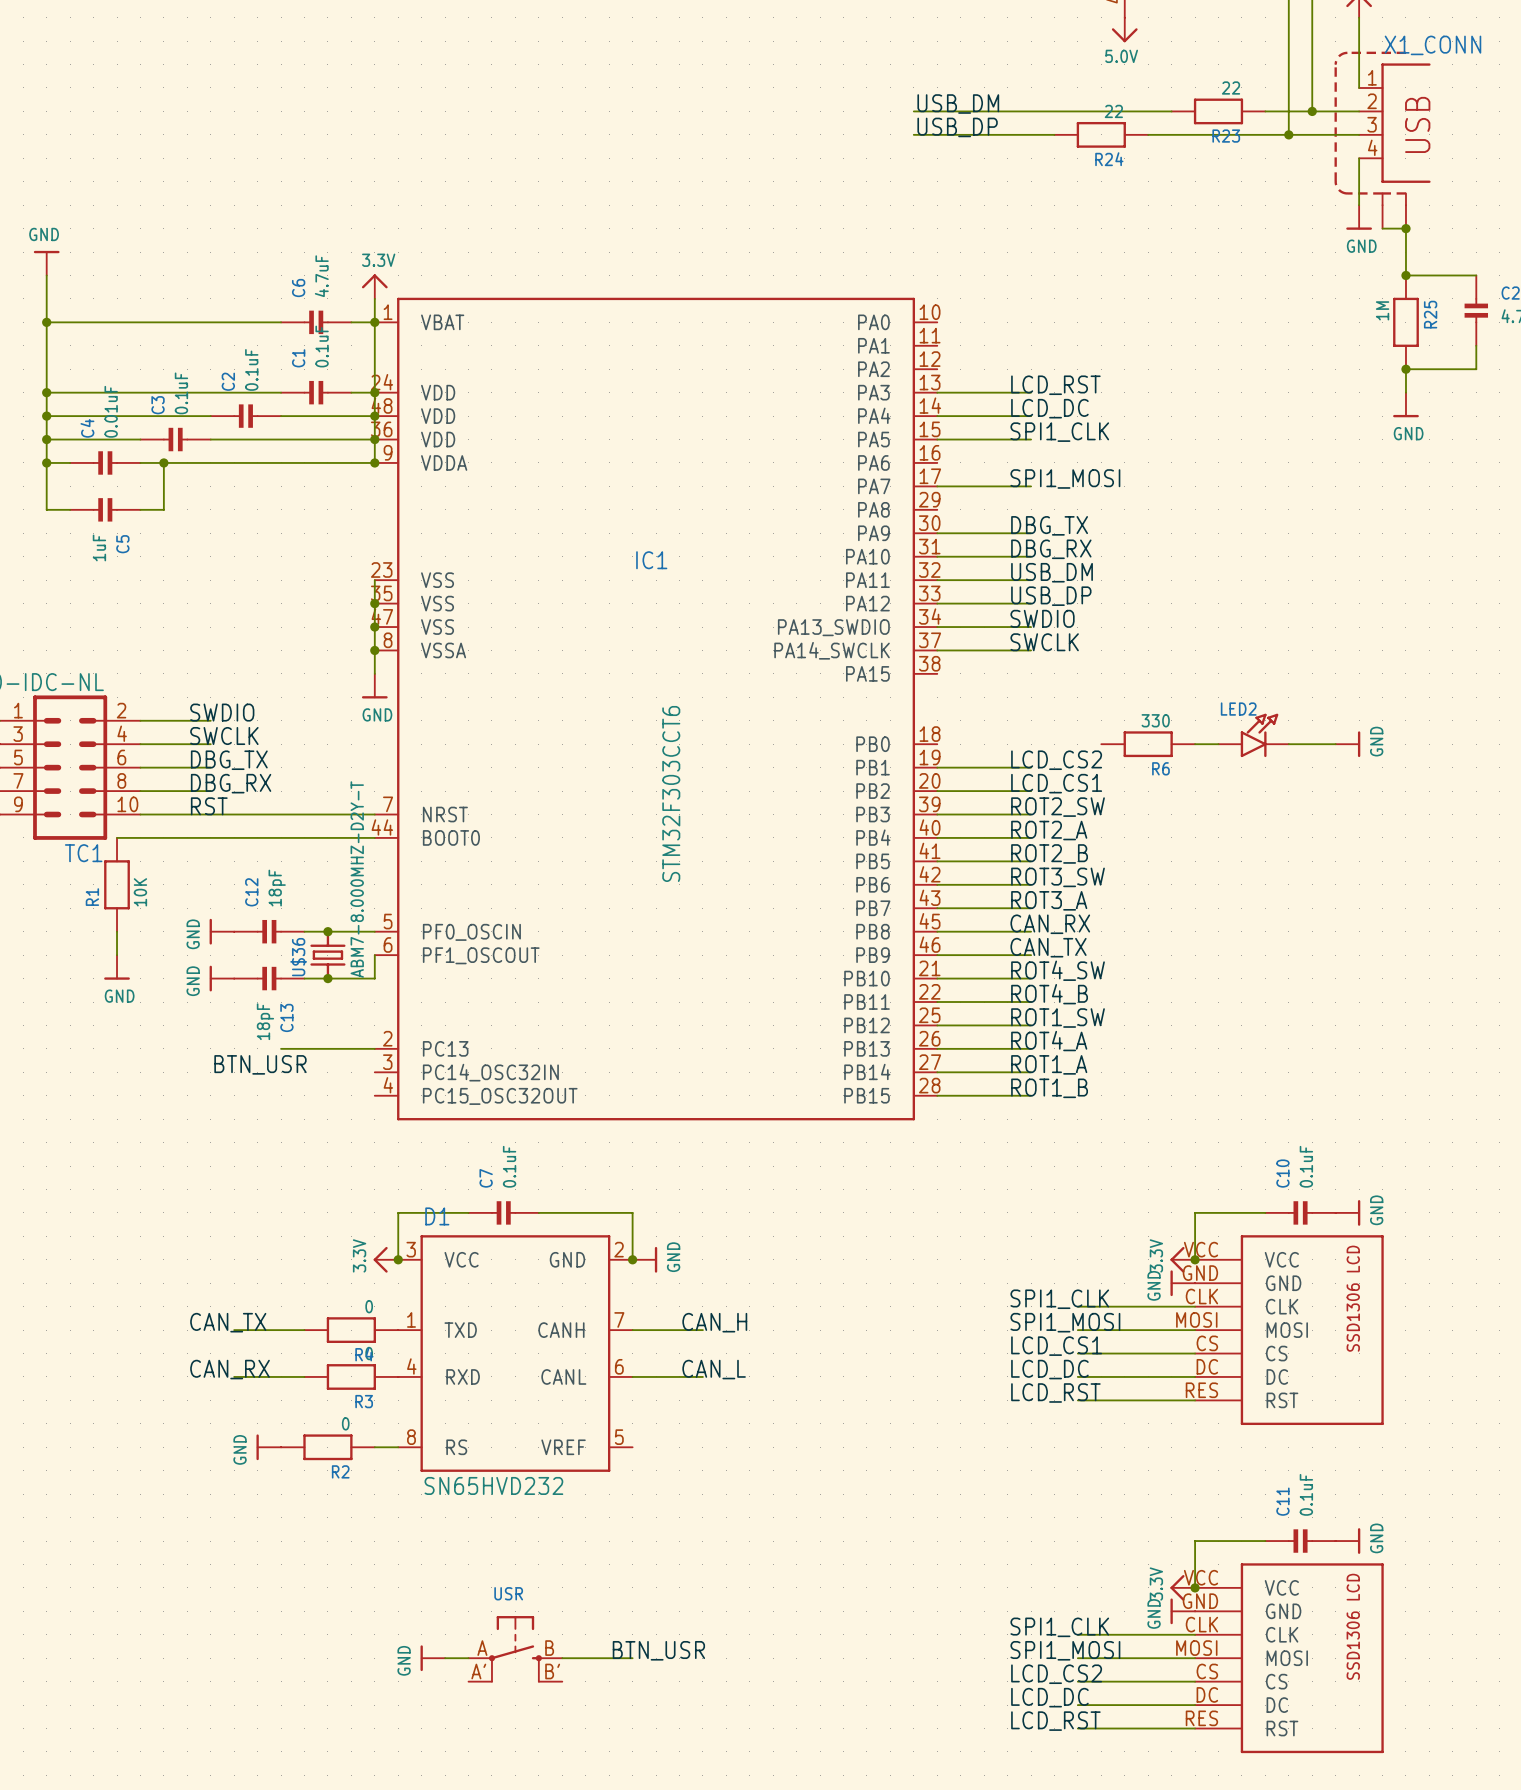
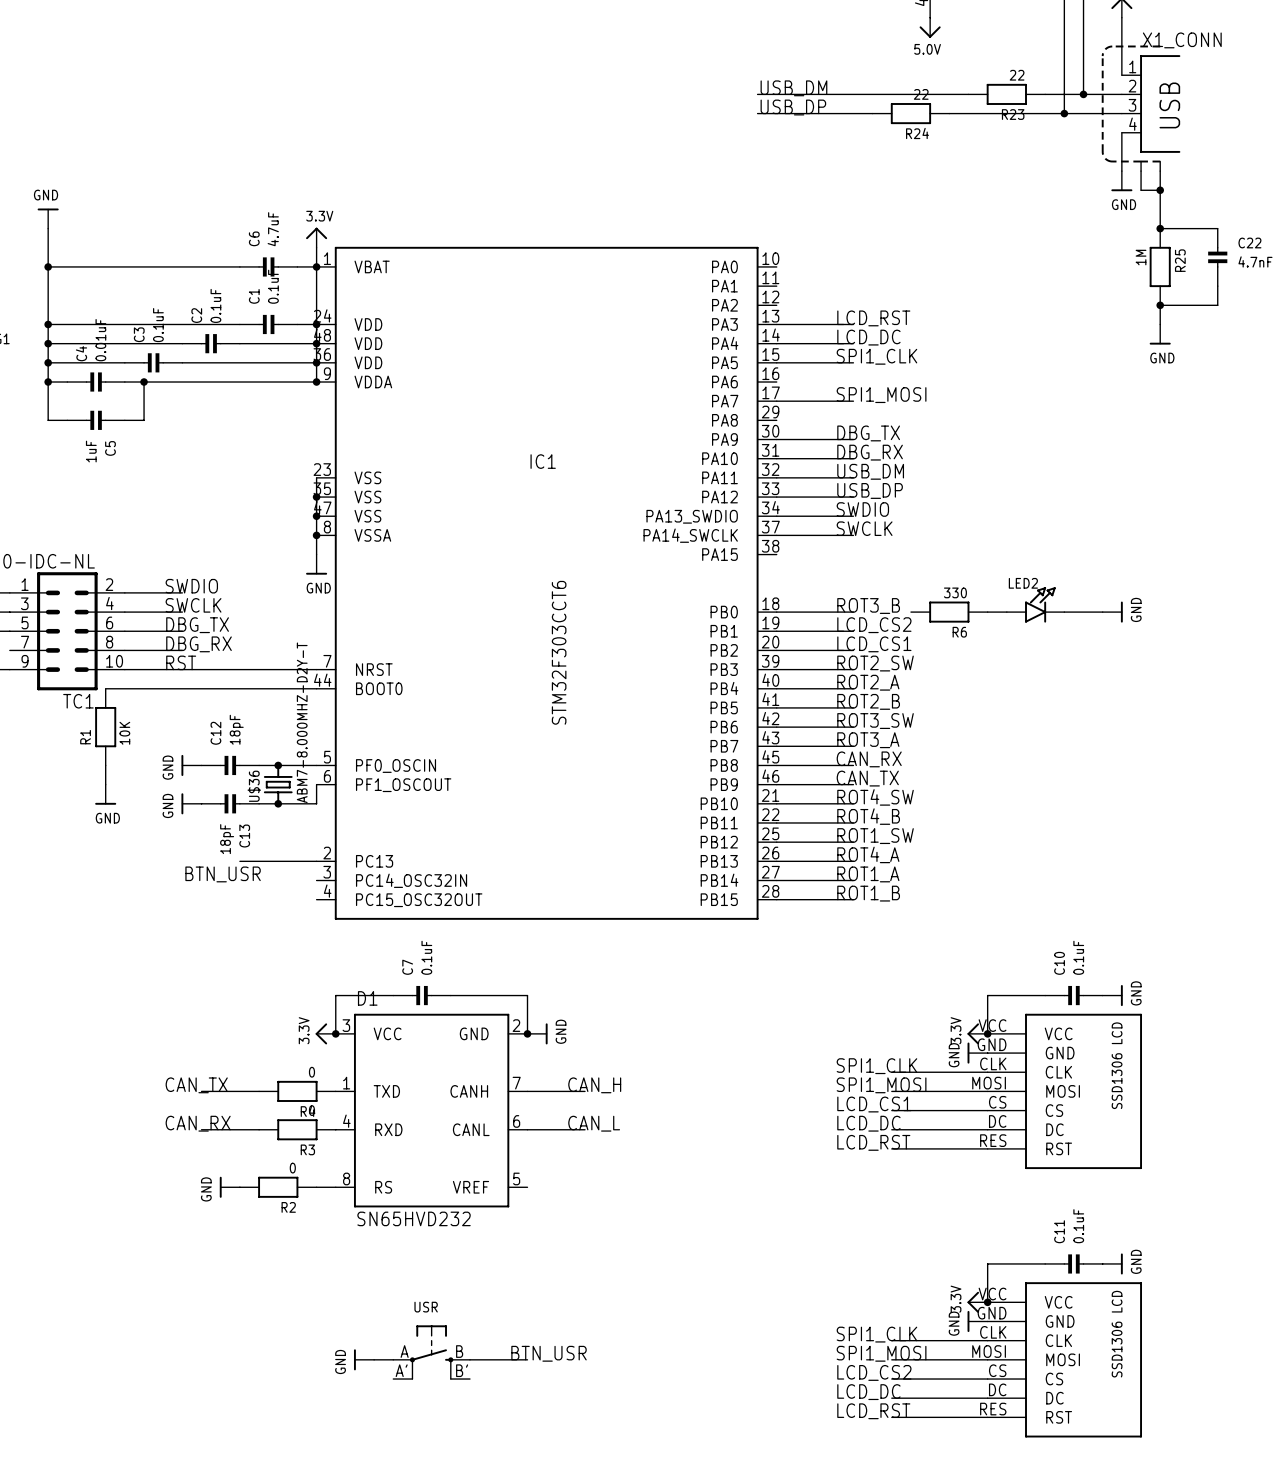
label: none -> ROT3_B (868, 606)
wire: none -> (776, 612) (853, 612)

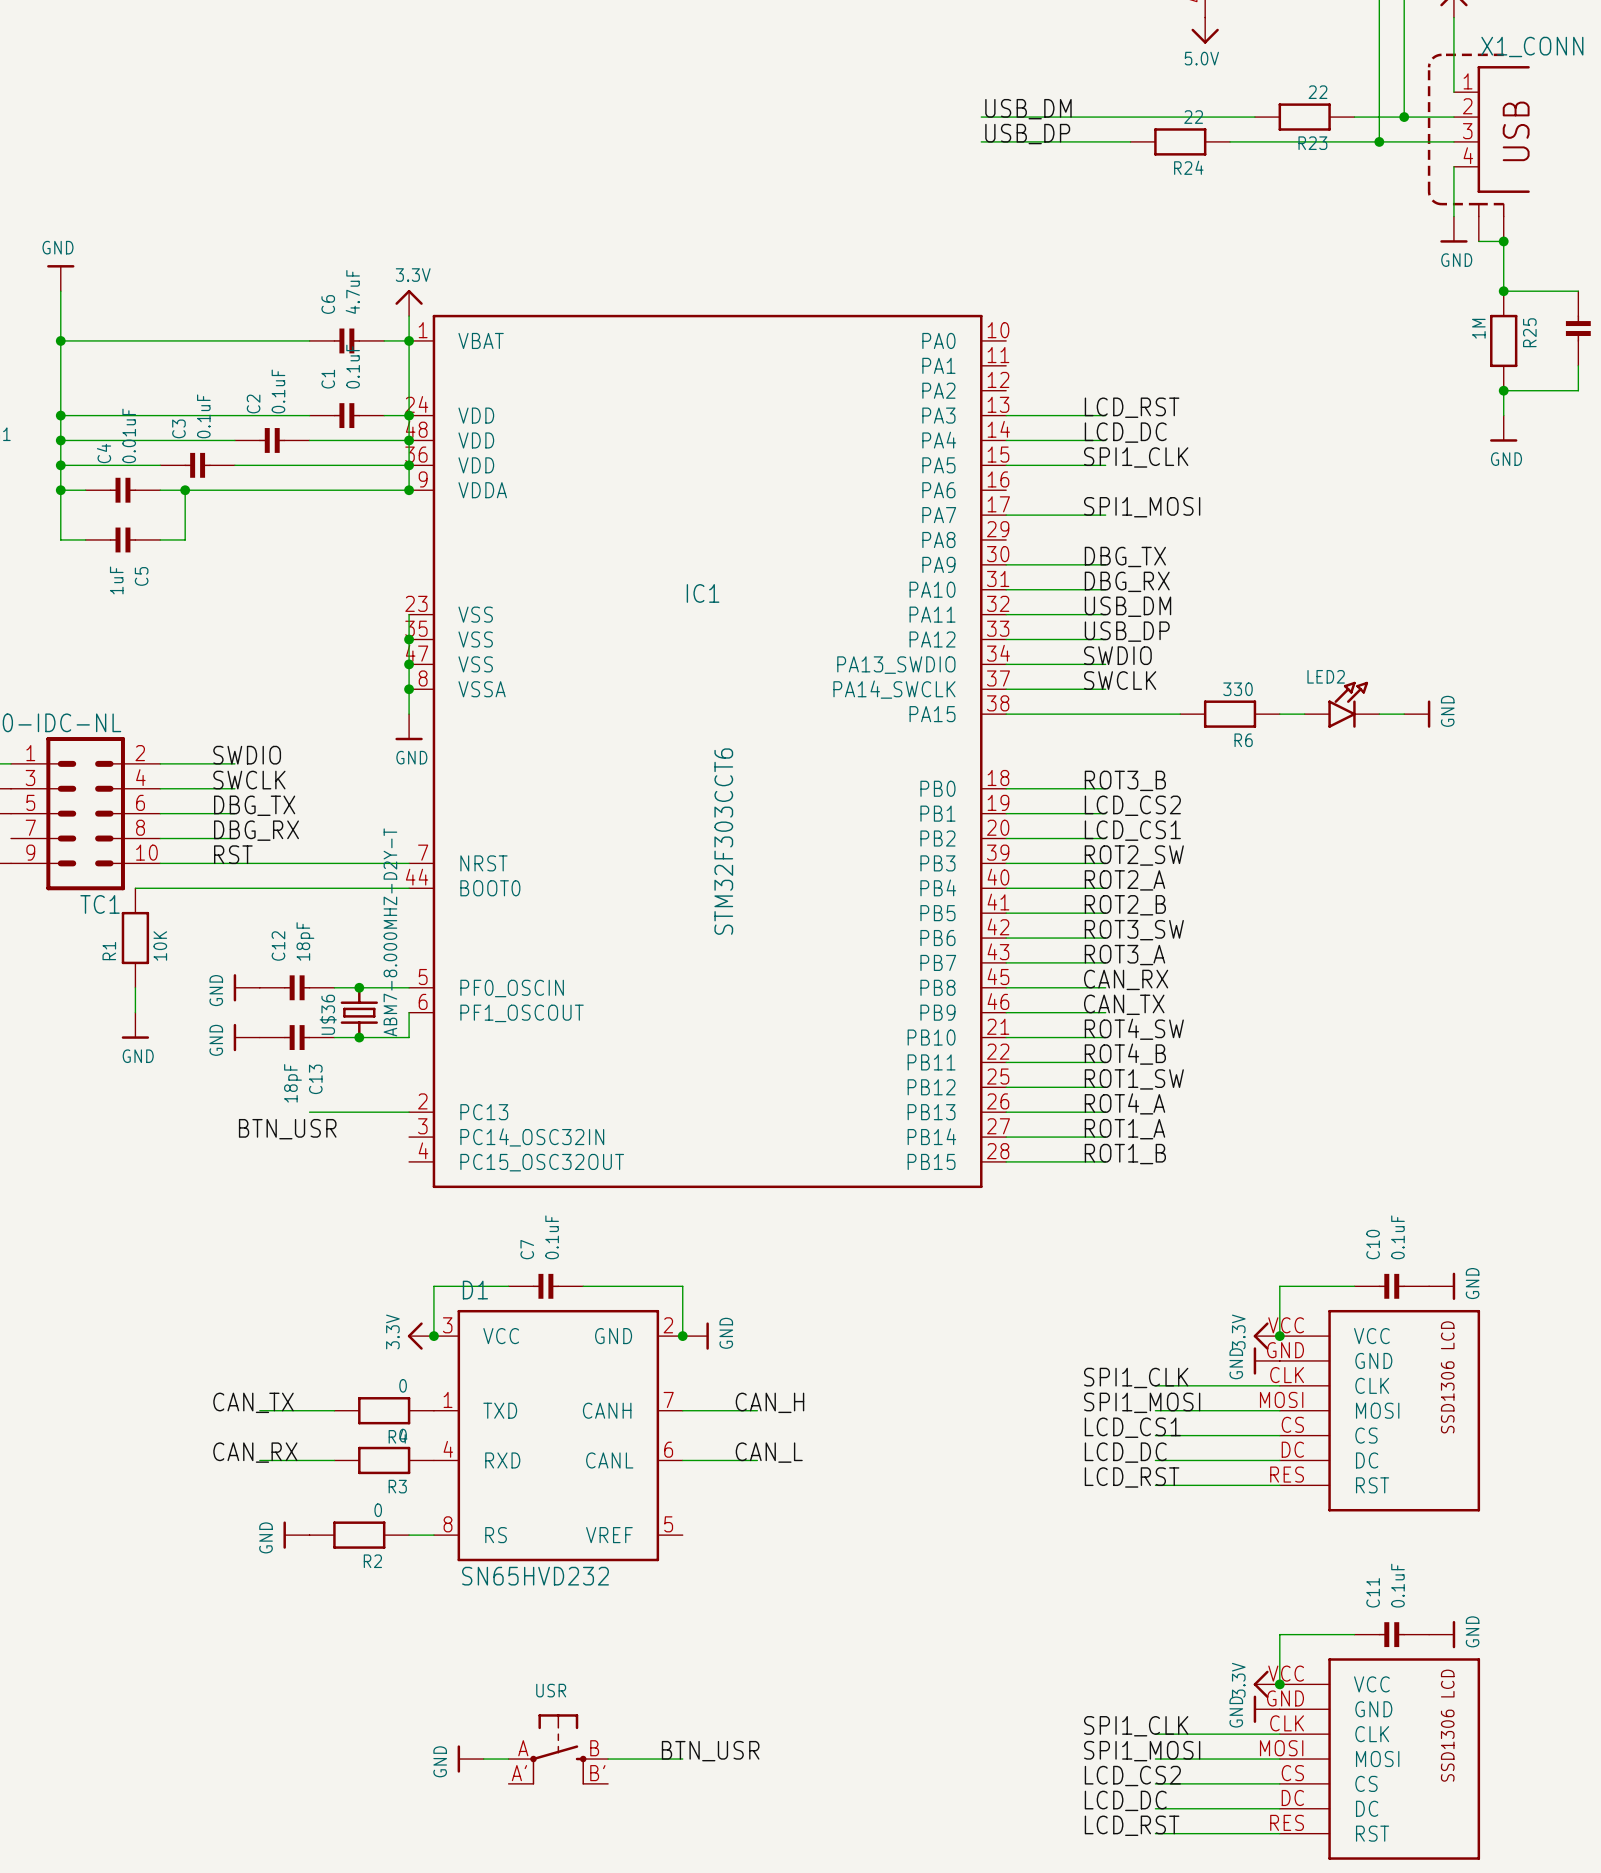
wire: none -> (1006, 714) (1180, 714)
wire: none -> (1379, 714) (1404, 714)
LED2 position: (1035, 604) -> (1342, 704)
R6 position: (949, 612) -> (1230, 714)
wire: (987, 612) (1006, 612) -> (1279, 714) (1304, 714)
wire: (1064, 612) (1102, 612) -> none
power symbol position: GND (1112, 612) -> GND (1417, 714)

